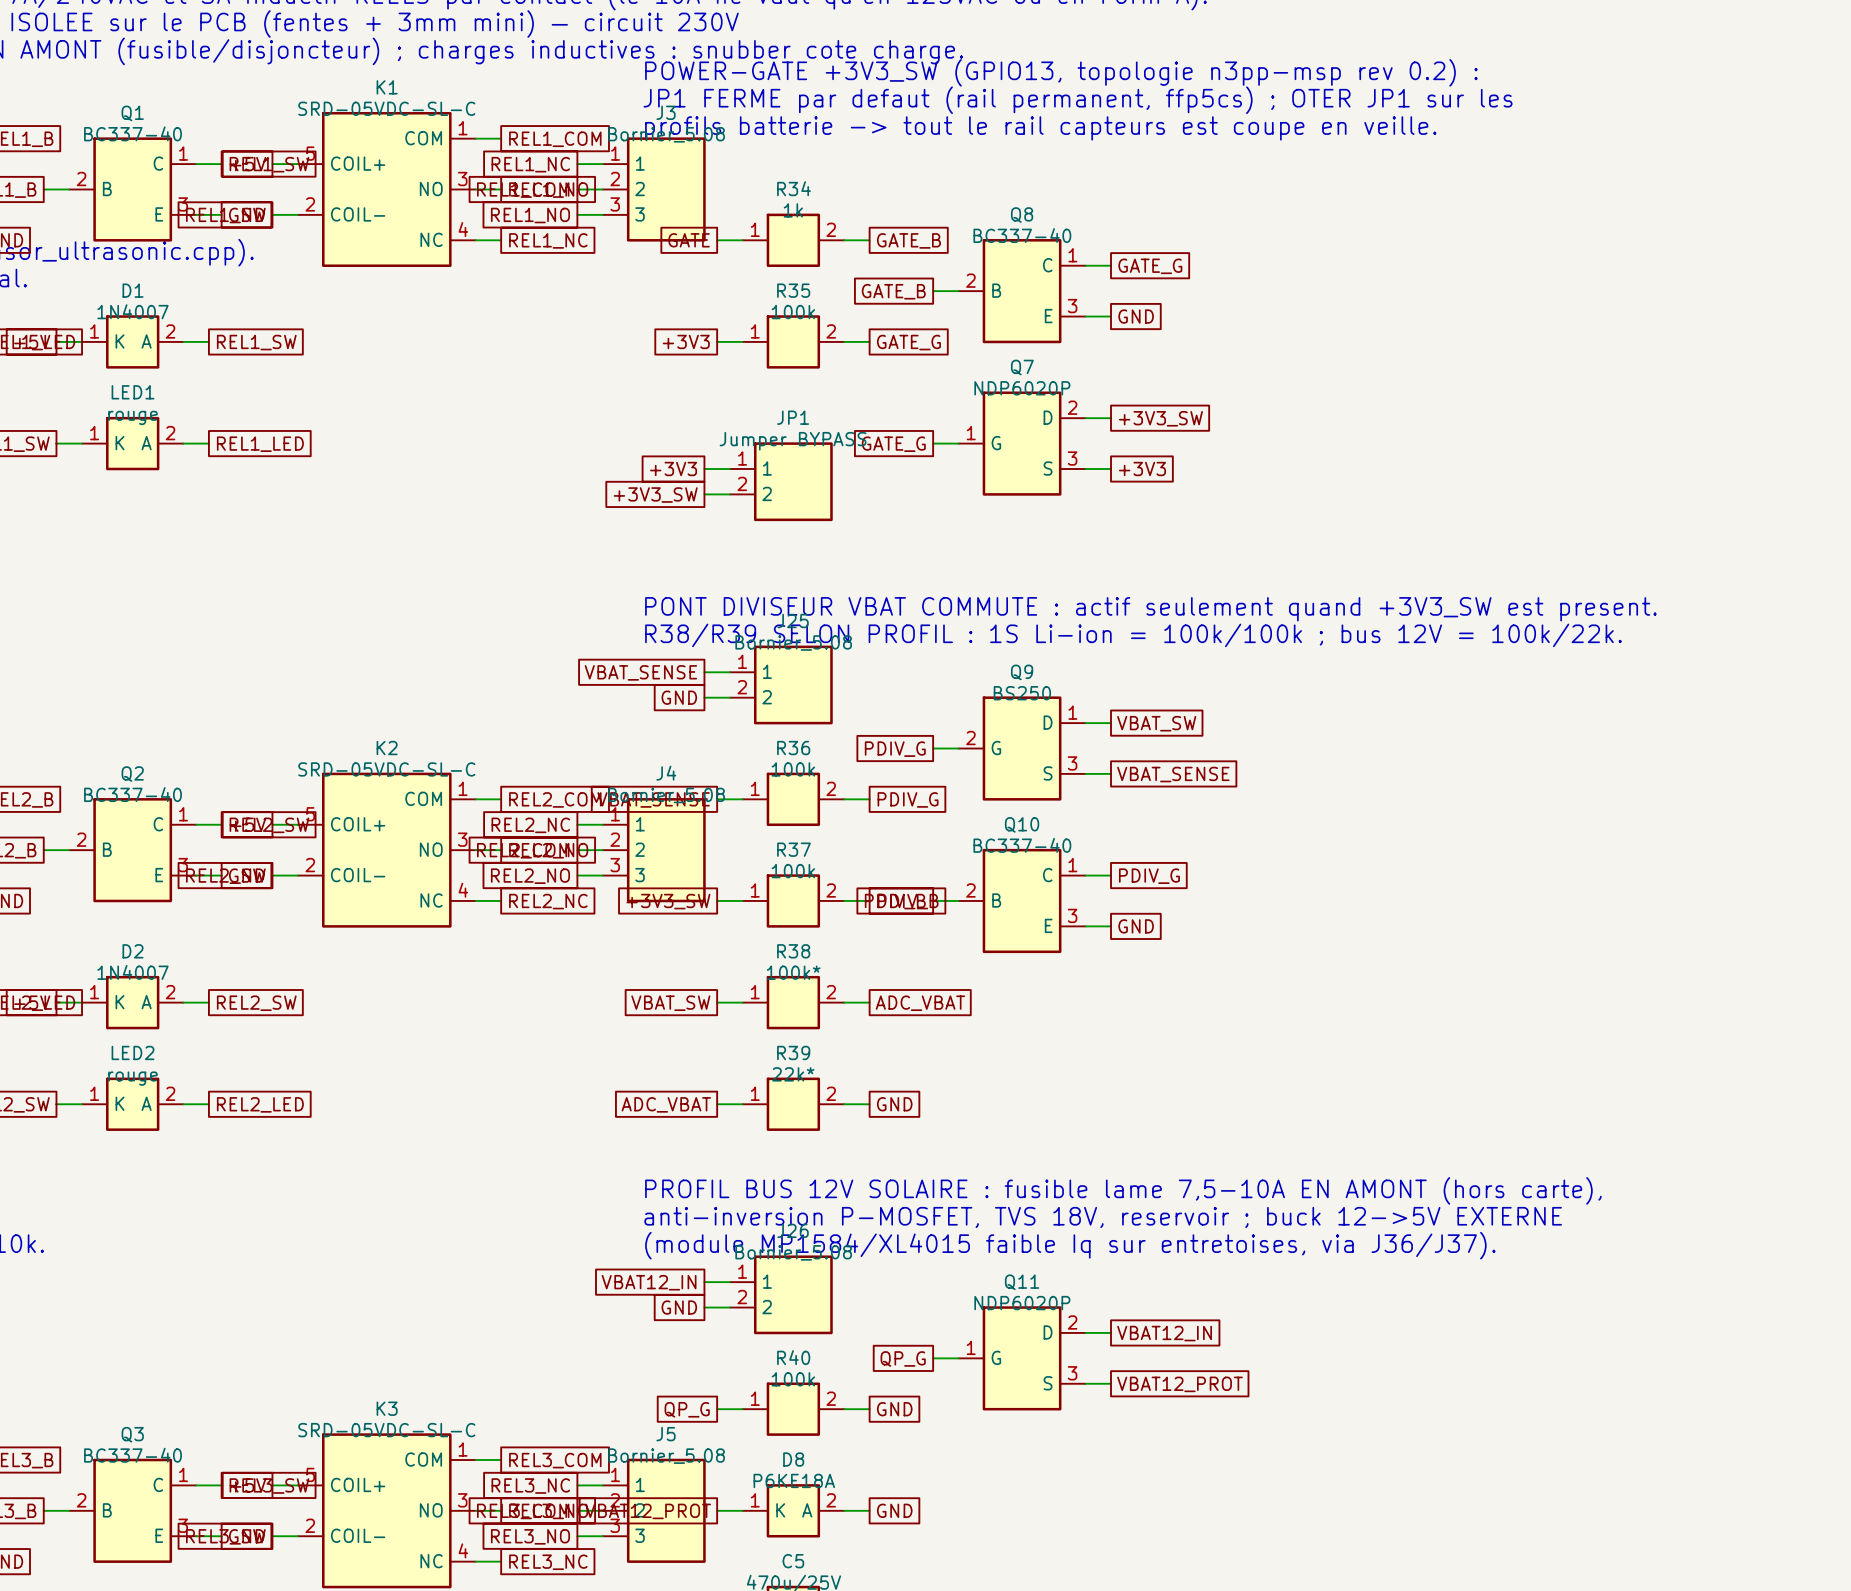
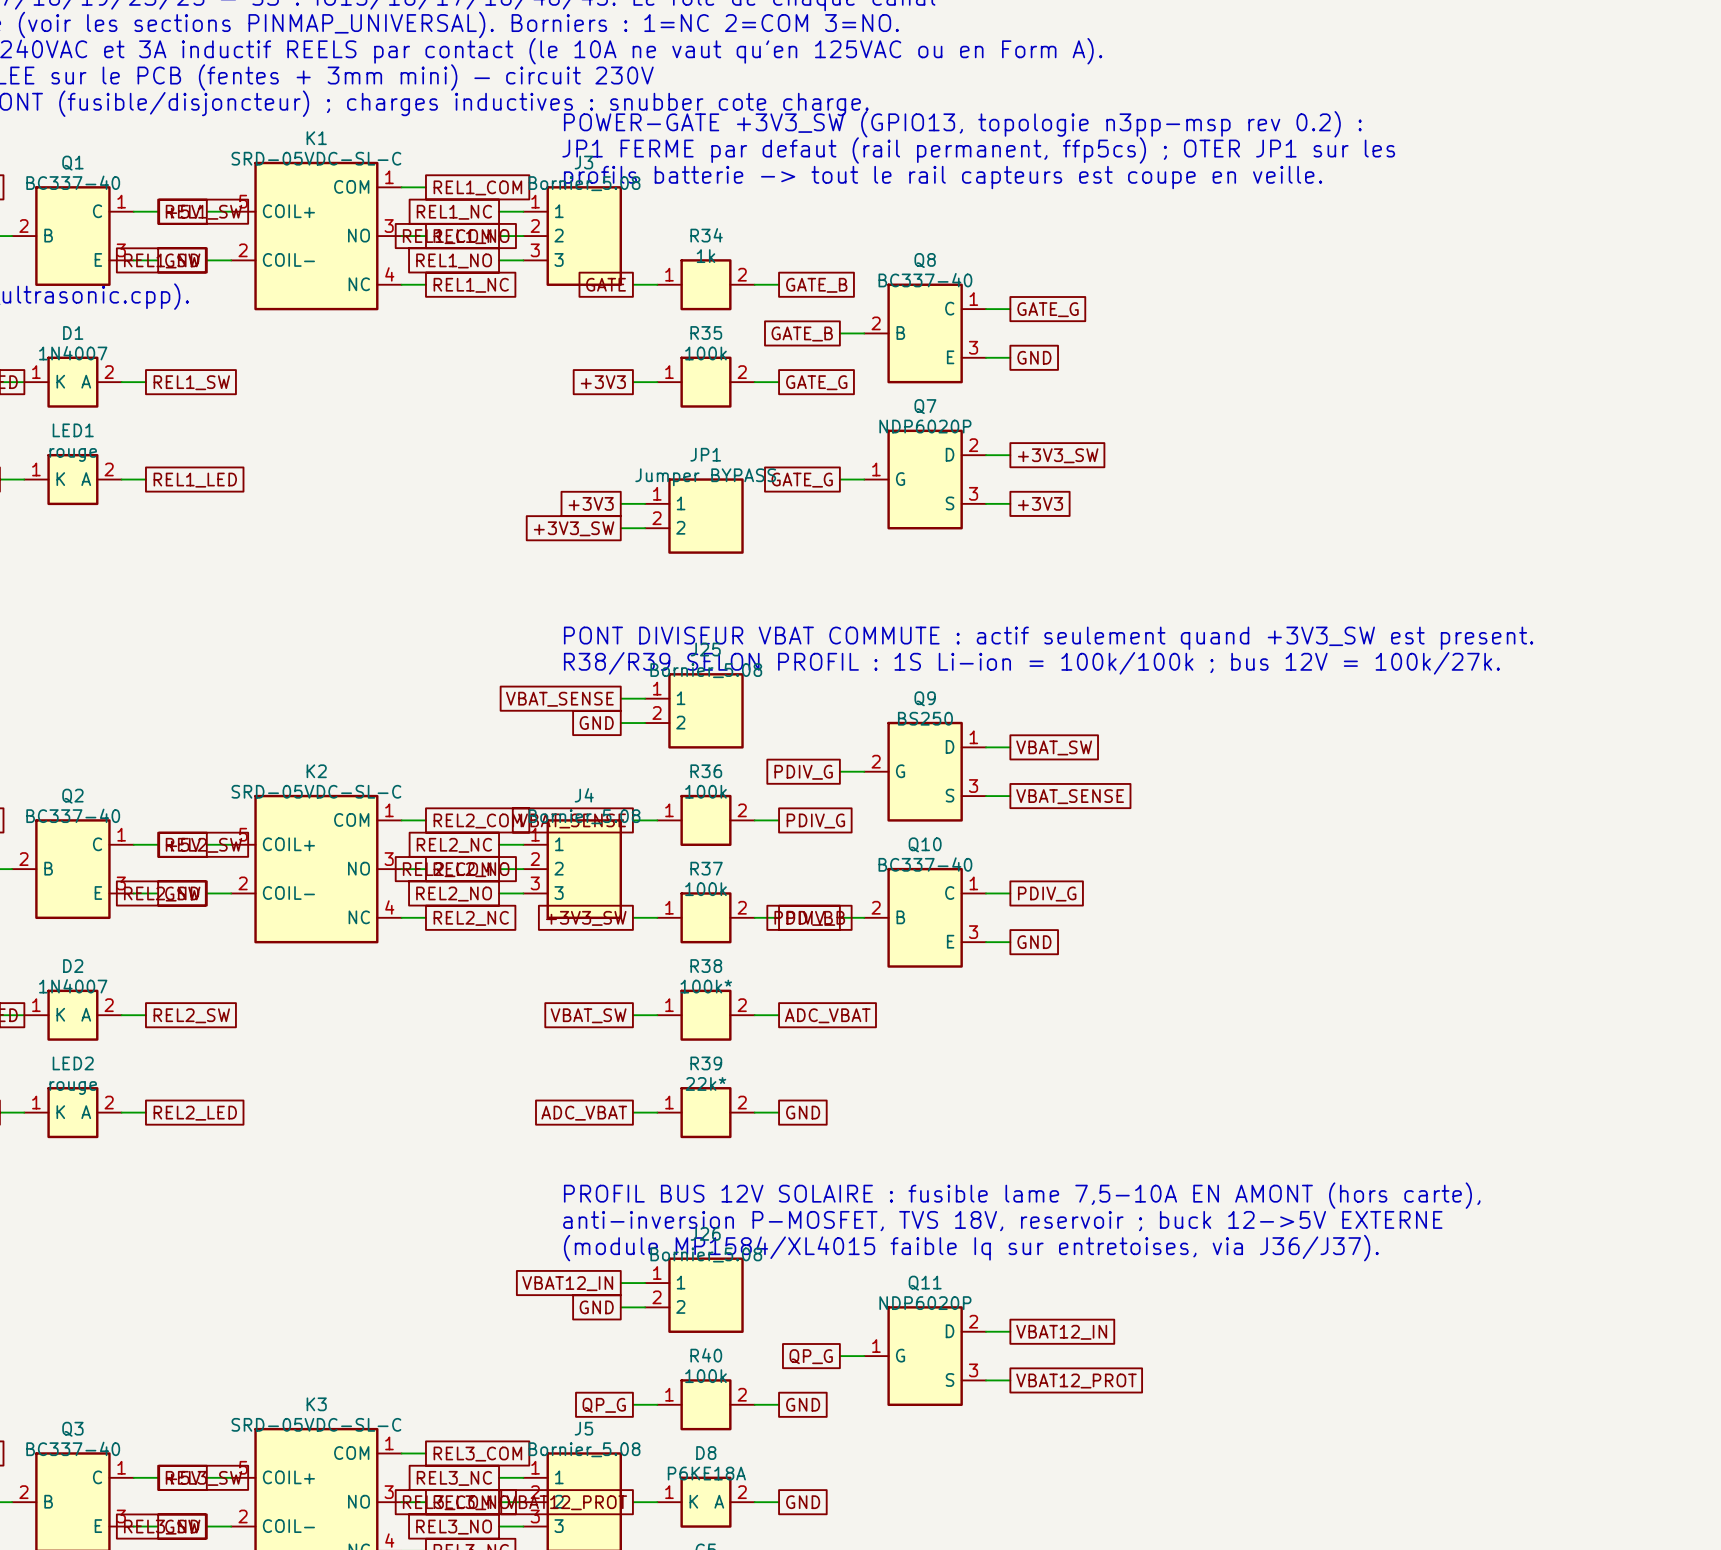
text: R38/R39 SELON PROFIL : 1S Li-ion = 100k/100k ; bus 12V = 100k/22k. (1133, 635) -> R38/R39 SELON PROFIL : 1S Li-ion = 100k/100k ; bus 12V = 100k/27k. (1031, 663)

